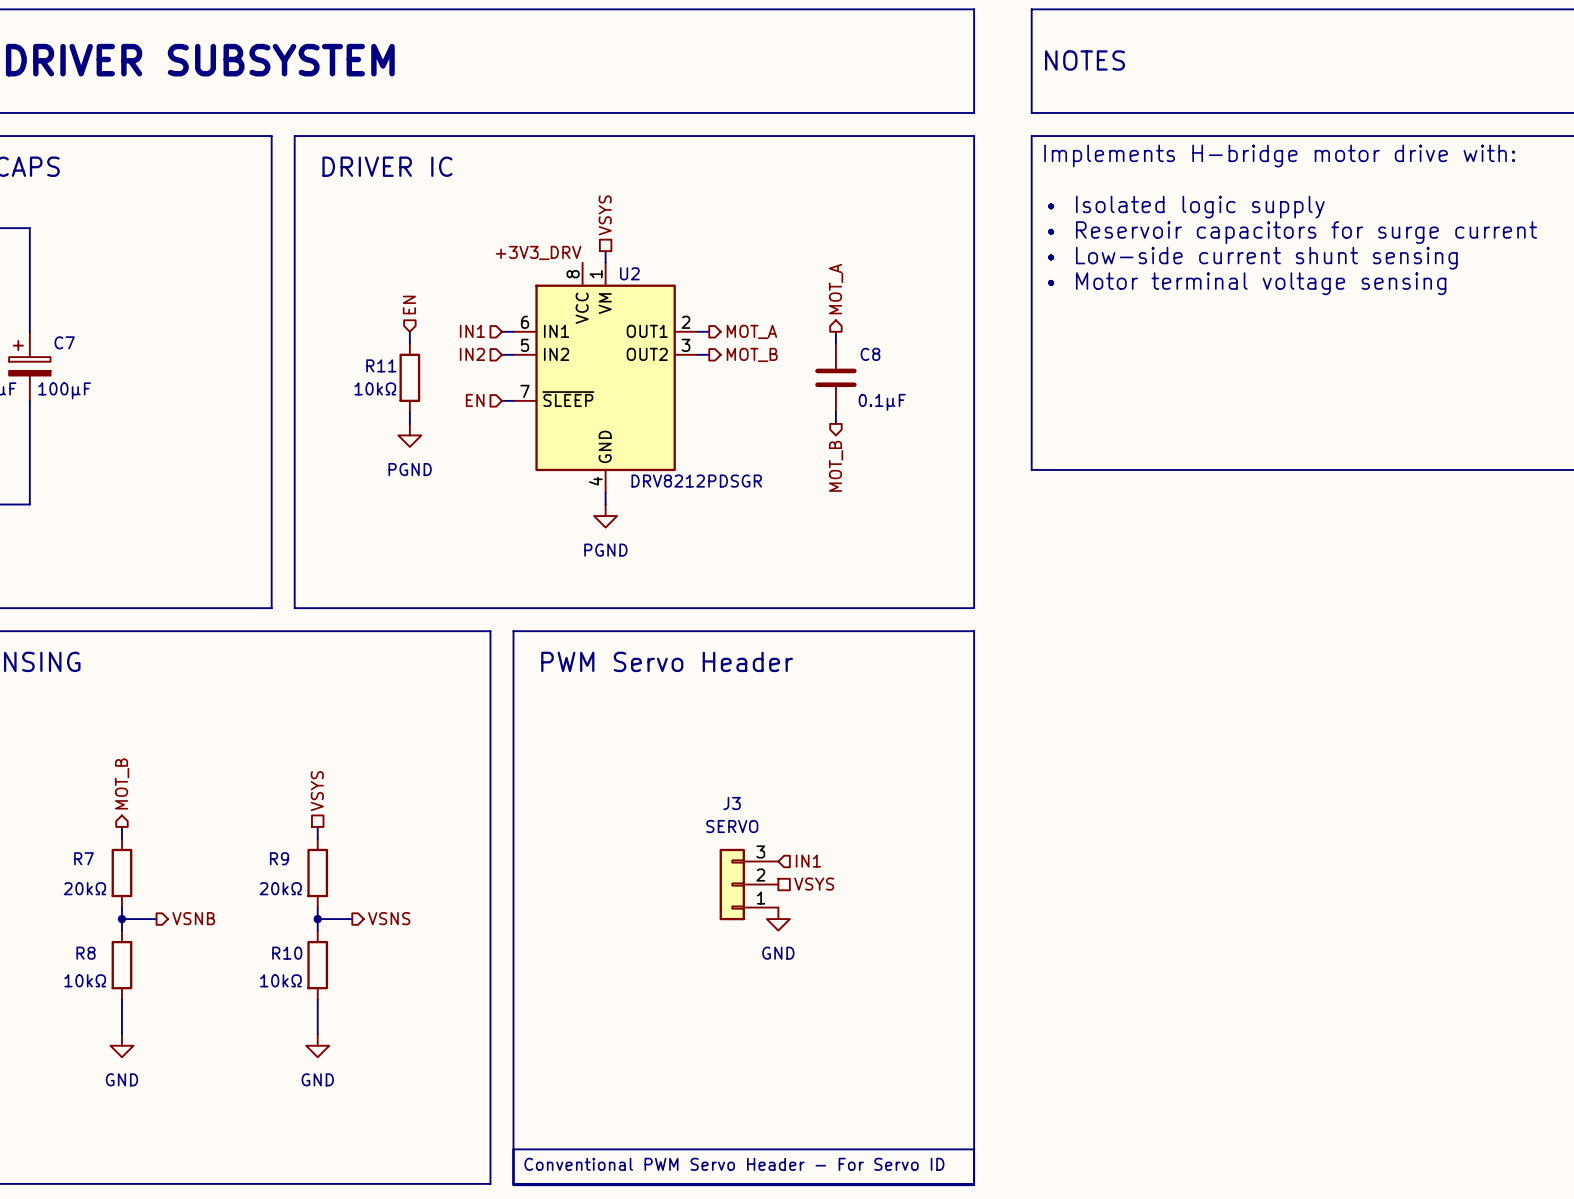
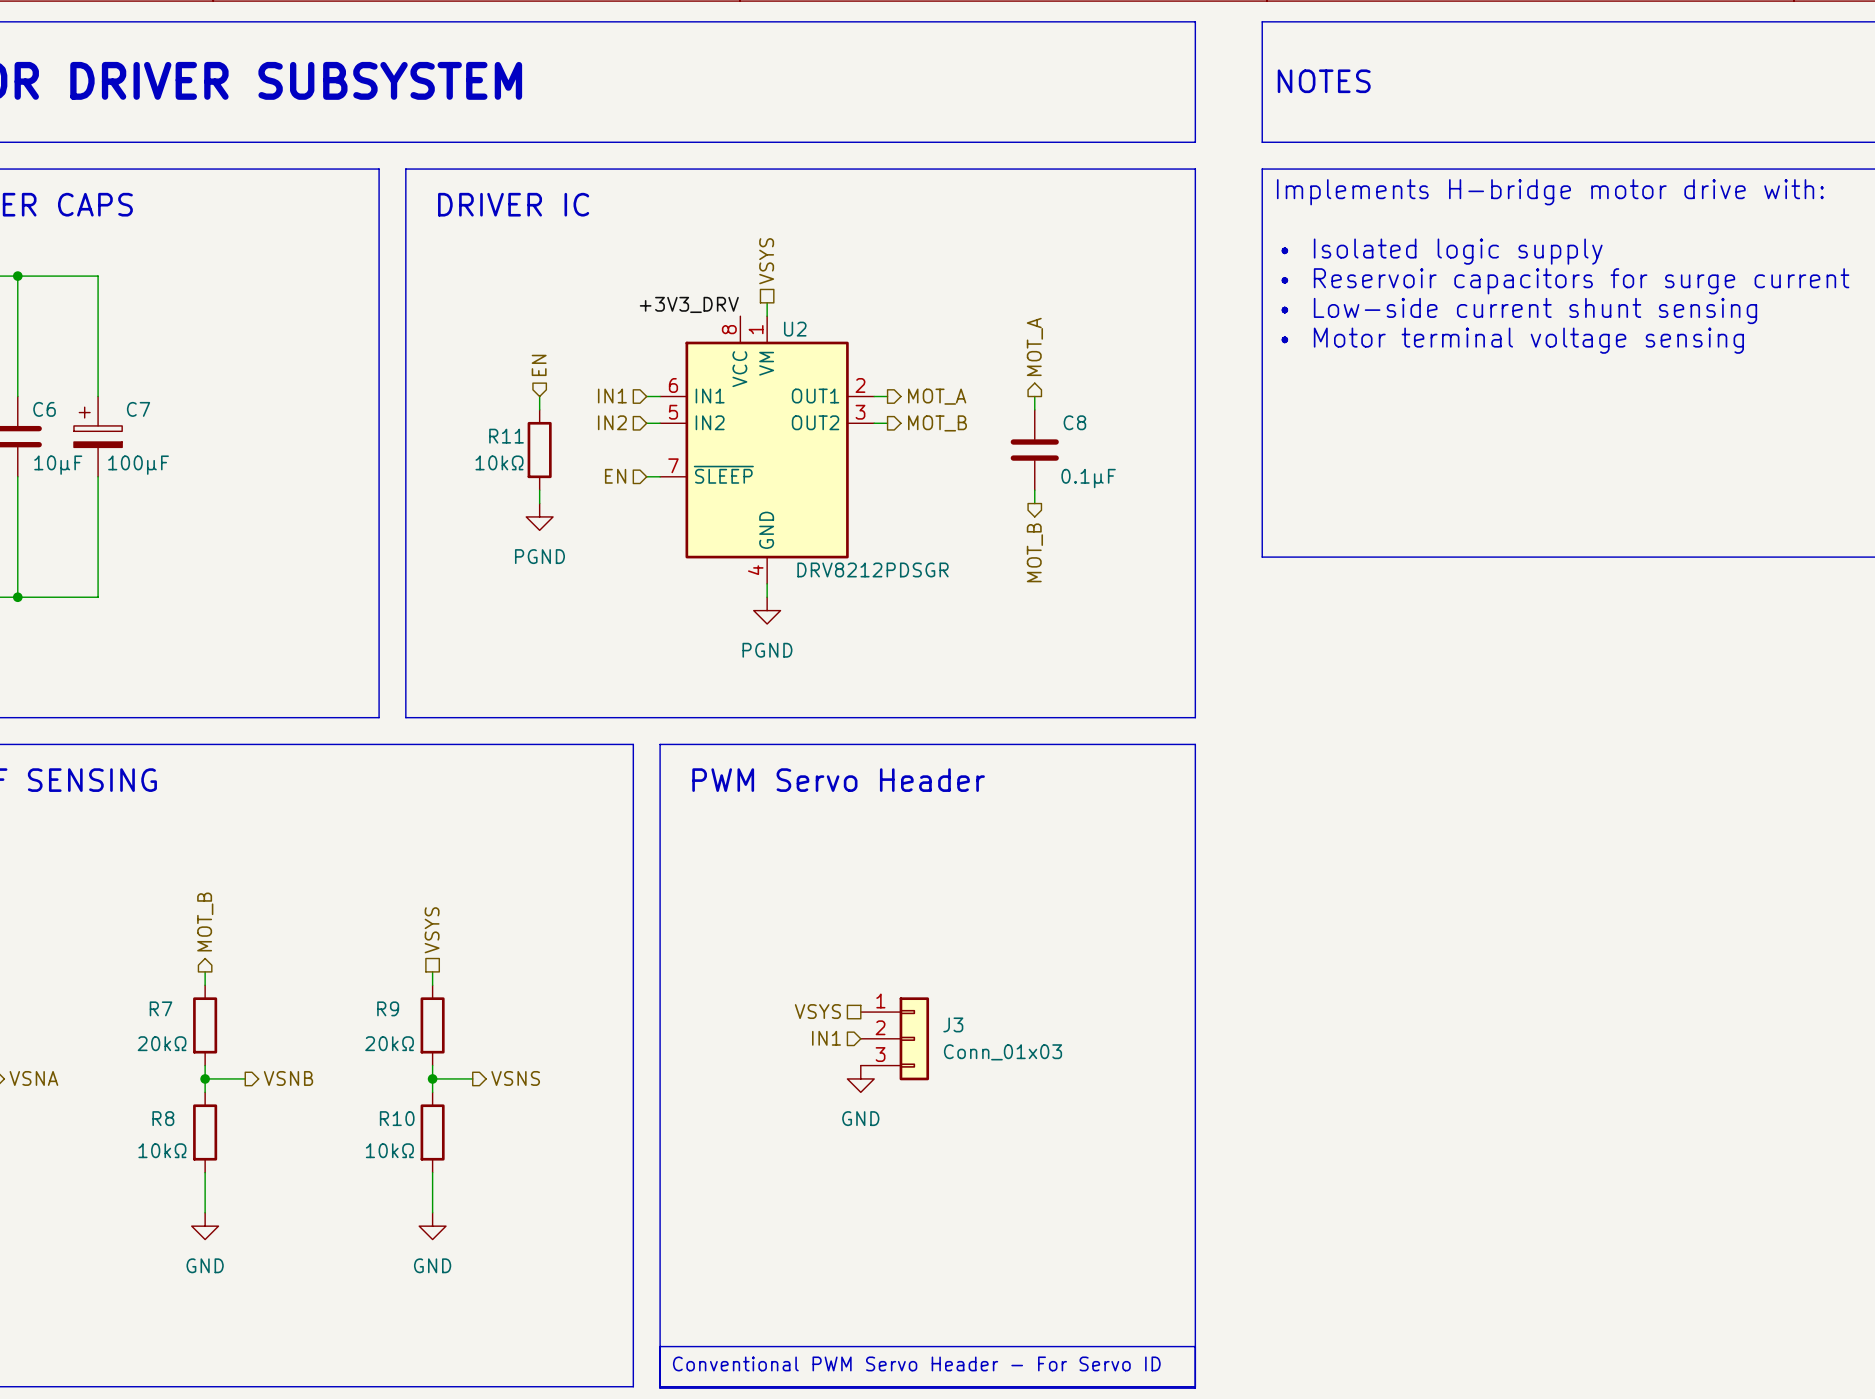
J3 name position: J3 (732, 803) -> J3 (953, 1024)
J3 value: SERVO (732, 826) -> Conn_01x03 (1003, 1052)
hierarchical label rotation: 0° (808, 861) -> 180° (826, 1038)
hierarchical label position: IN1 (808, 861) -> IN1 (826, 1038)
J3 rotation: 0° (732, 884) -> 180° (914, 1038)
hierarchical label rotation: 0° (814, 884) -> 180° (817, 1011)
hierarchical label position: VSYS (814, 884) -> VSYS (817, 1011)
power symbol position: GND (778, 919) -> GND (860, 1078)

